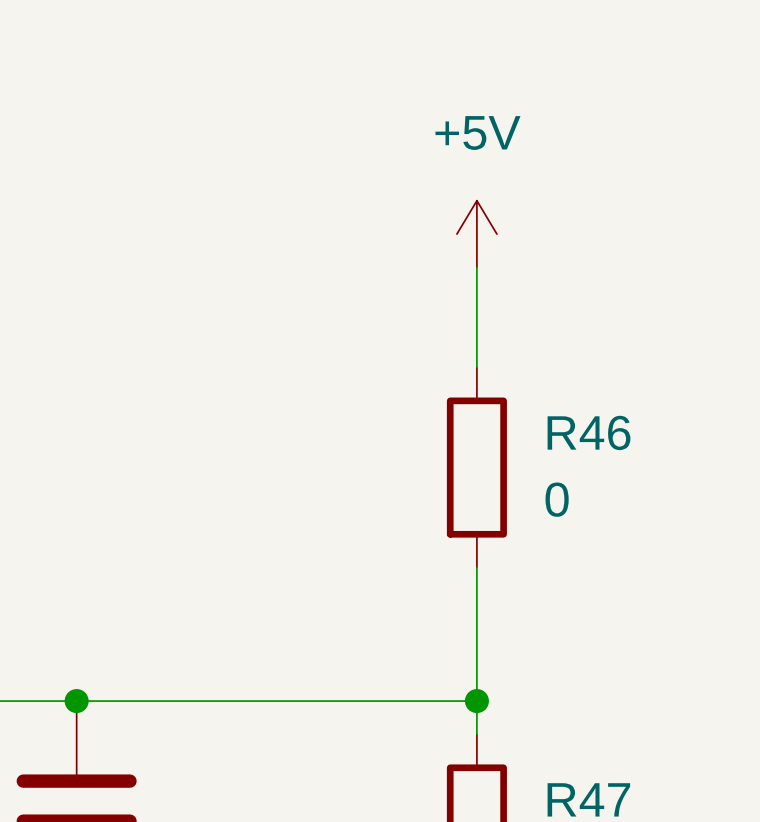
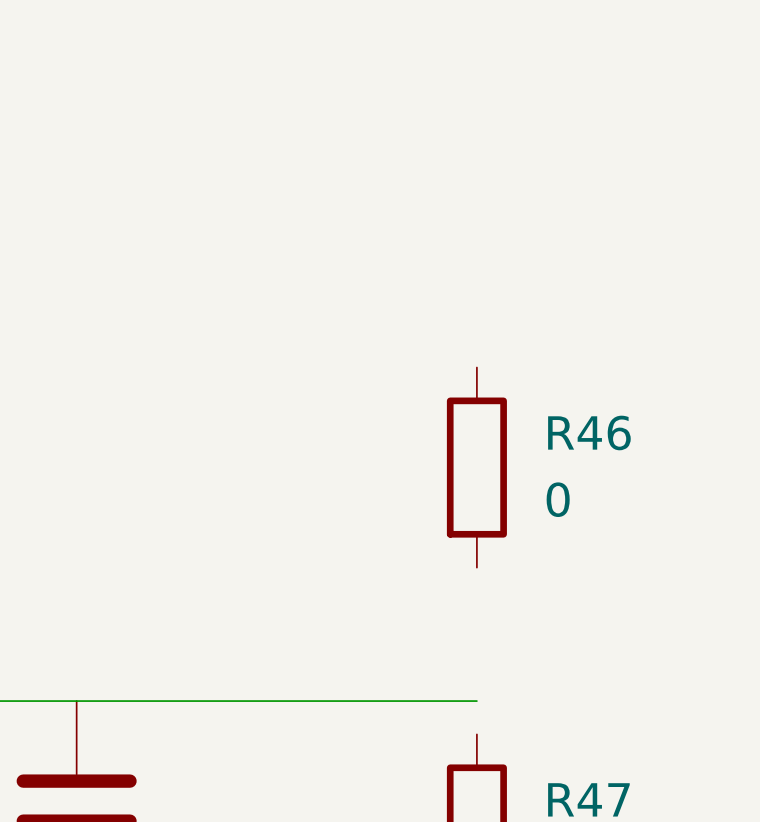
power symbol: +5V (476, 234) -> none
wire: (476, 267) (476, 367) -> none
wire: (476, 567) (476, 734) -> none
junction: (76, 701) -> none
junction: (476, 701) -> none

